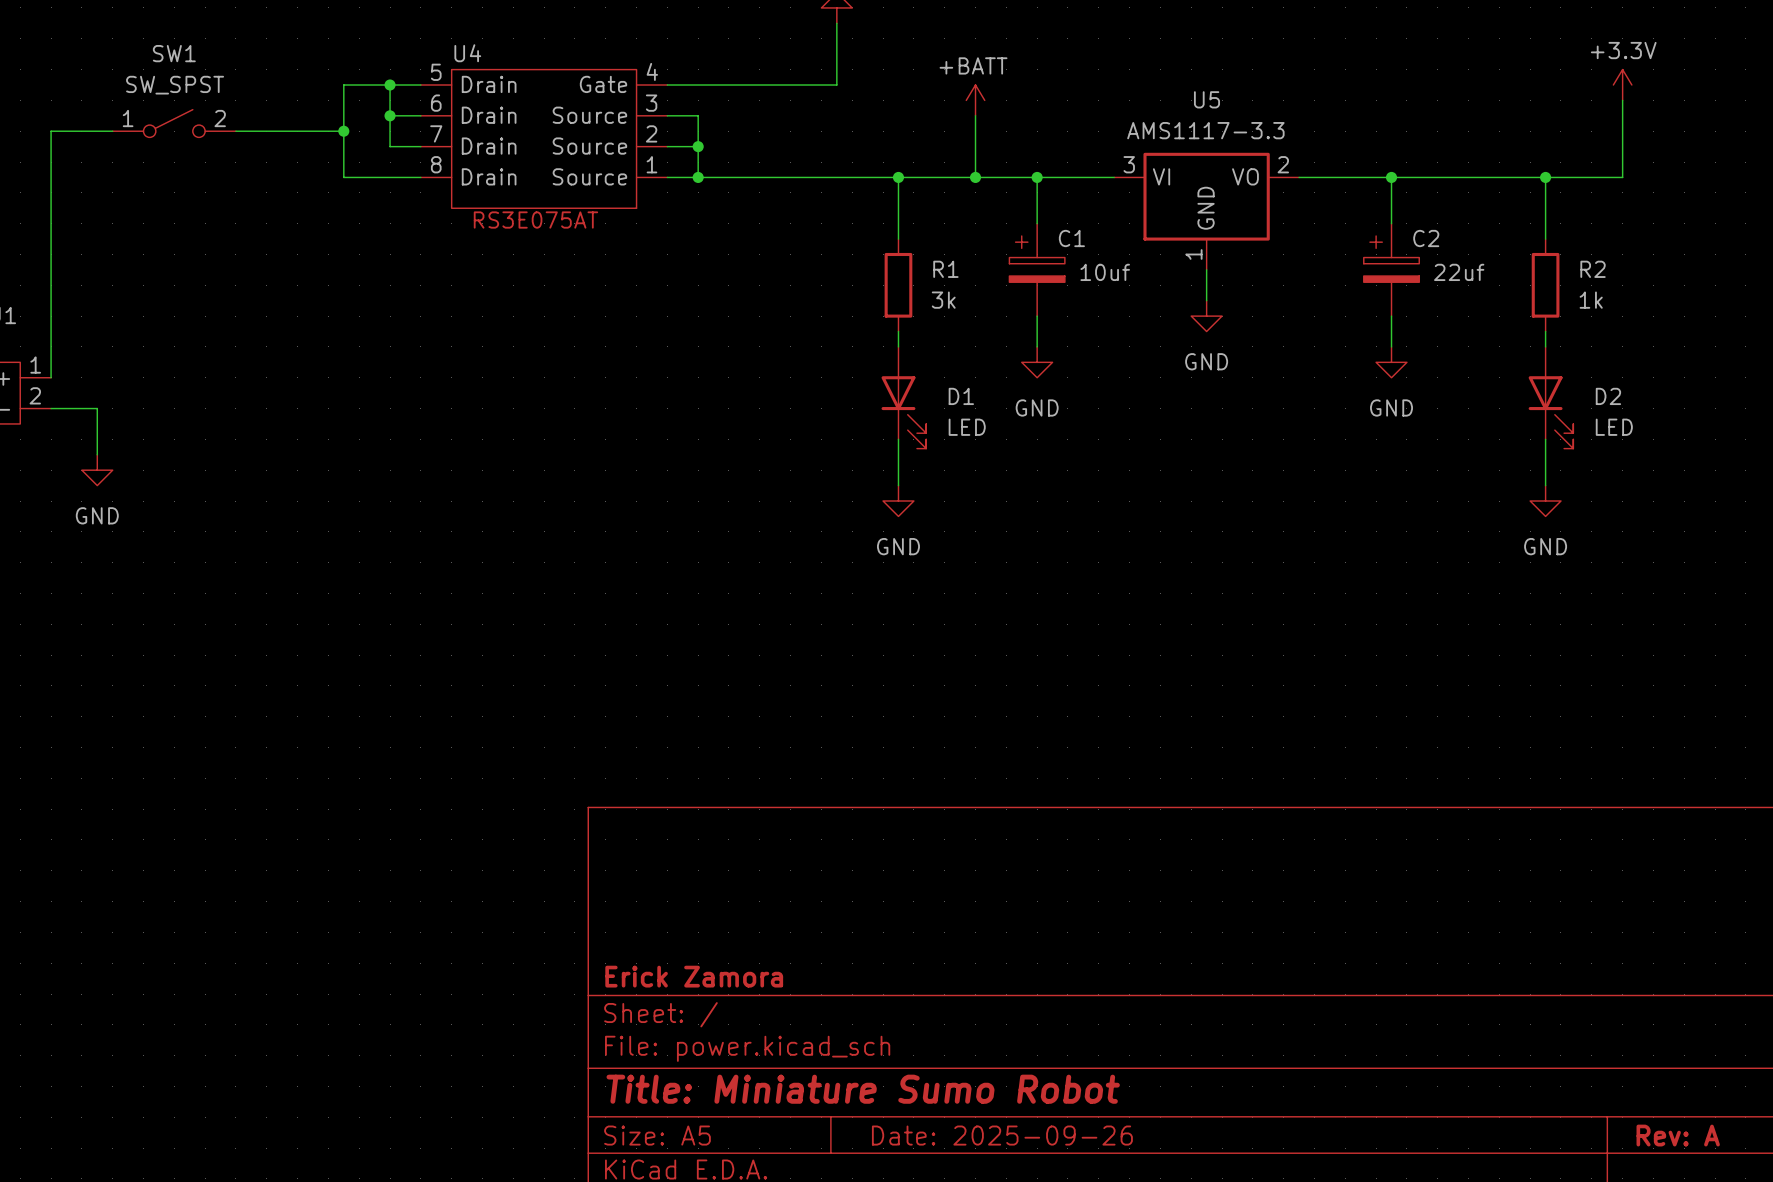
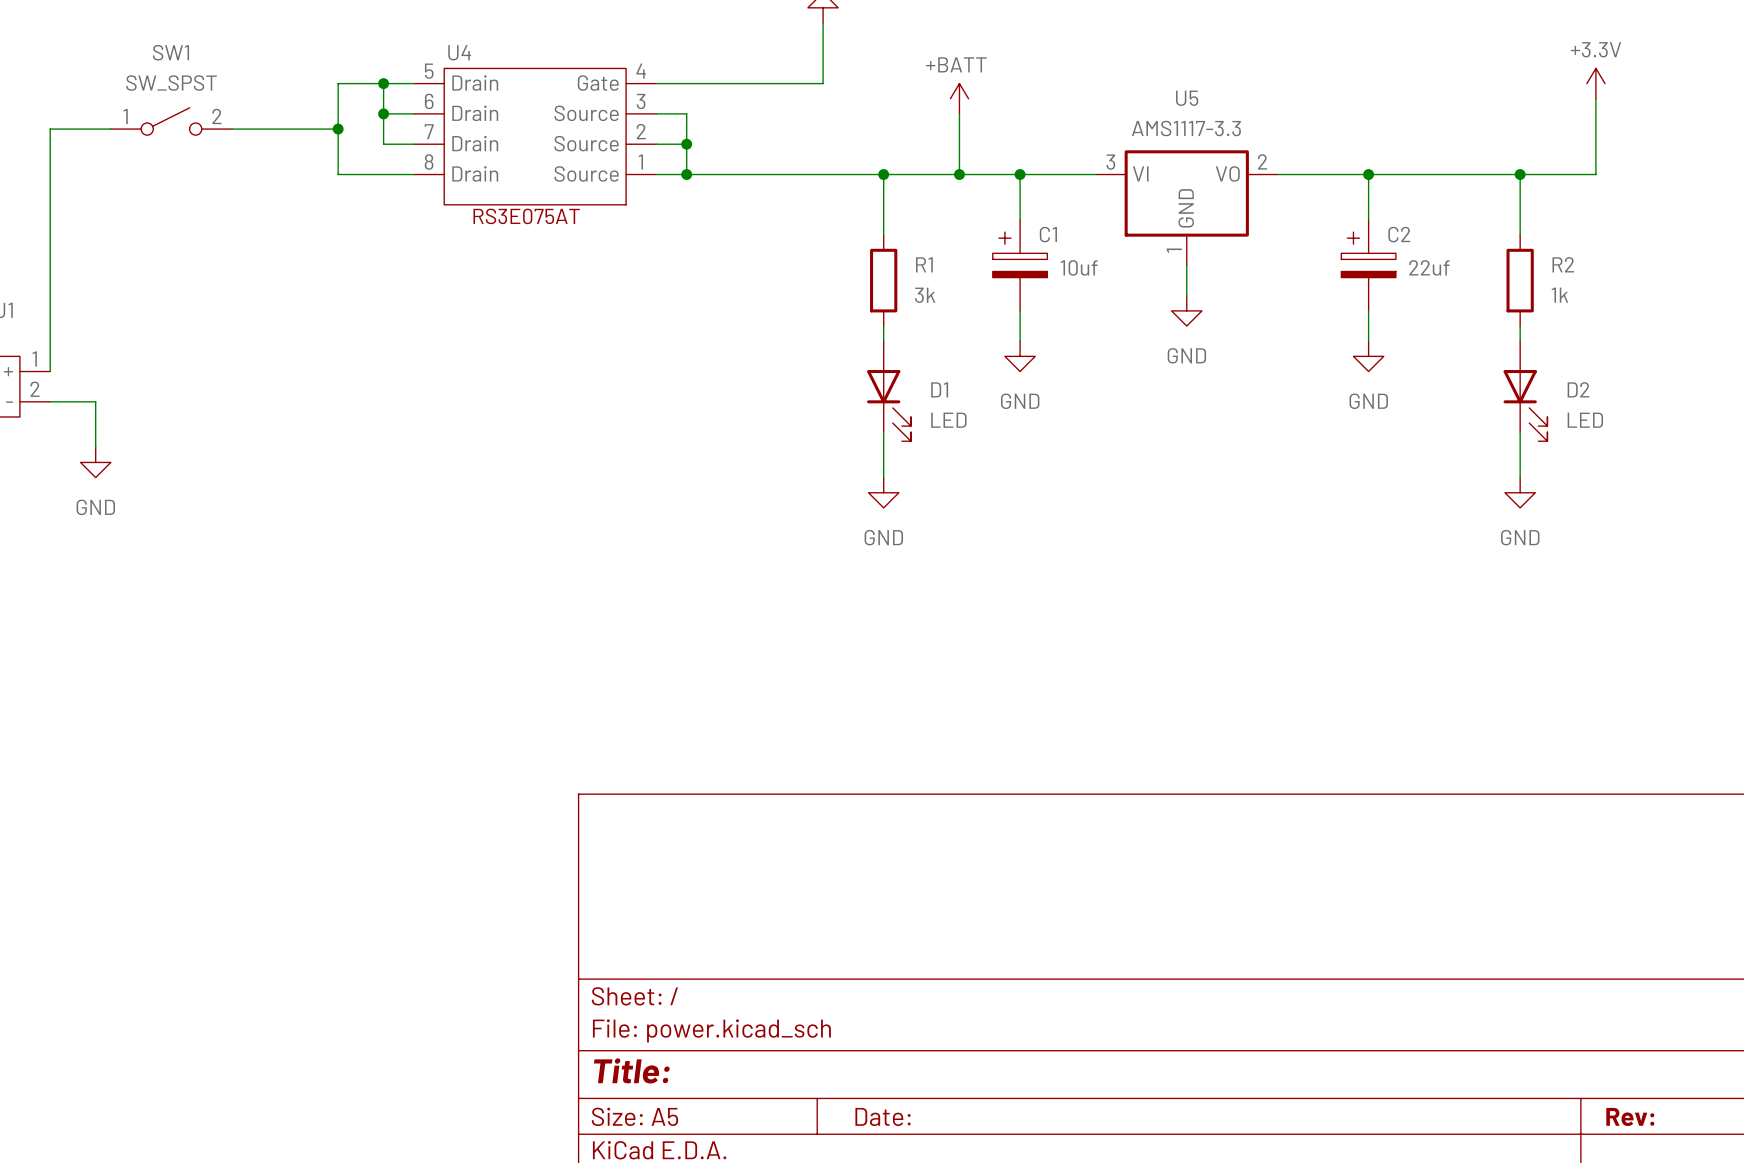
title block: Erick Zamora (694, 976) -> none
title block: Title: Miniature Sumo Robot (863, 1089) -> Title: (631, 1070)
title block: Date: 2025-09-26 (1002, 1135) -> Date: (883, 1116)
title block: Rev: A (1678, 1135) -> Rev: (1630, 1116)

